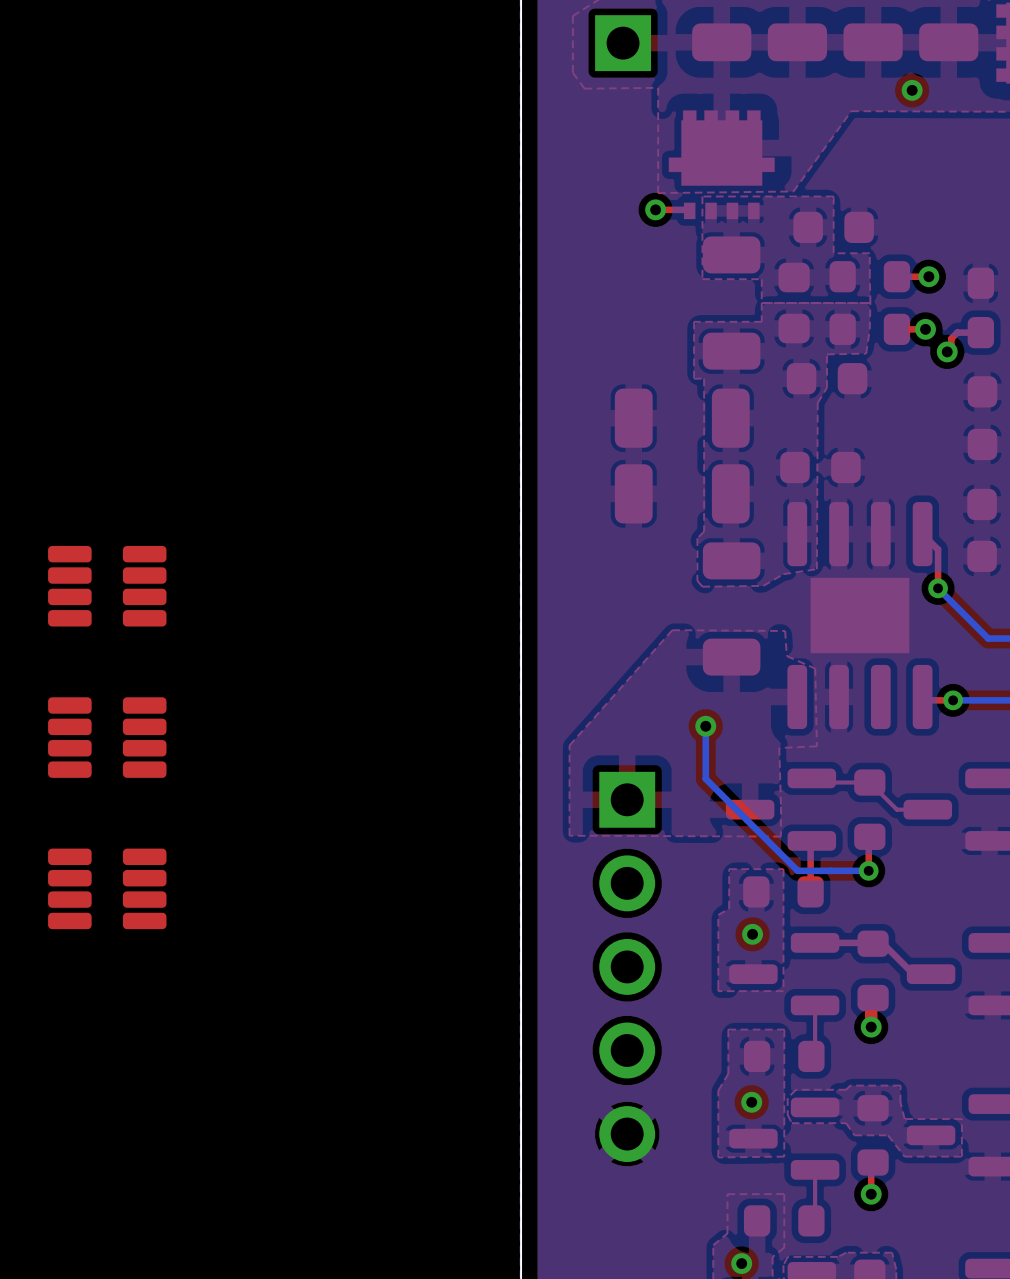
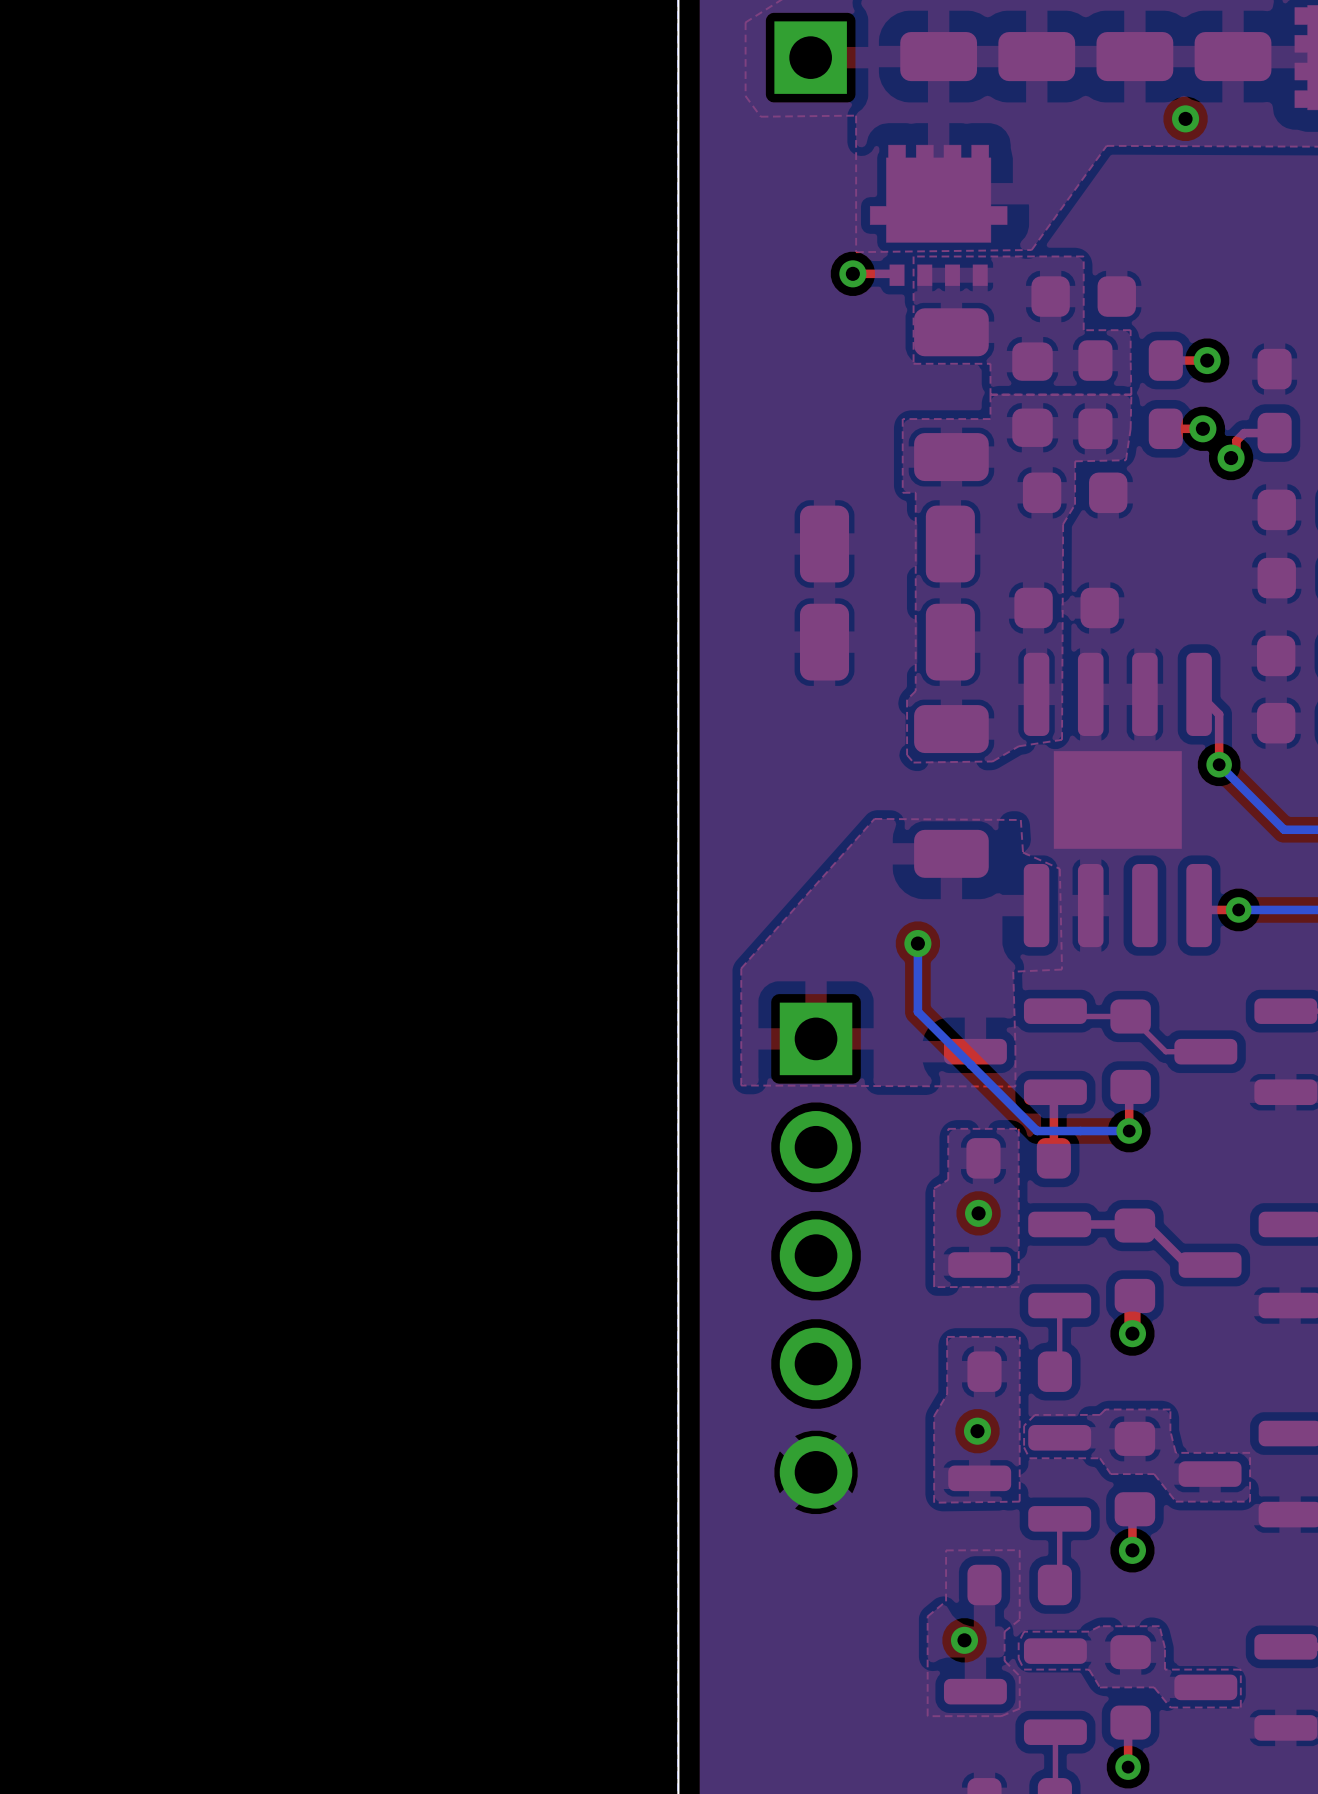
part: (107, 586) -> none
part: (107, 737) -> none
part: (107, 888) -> none

